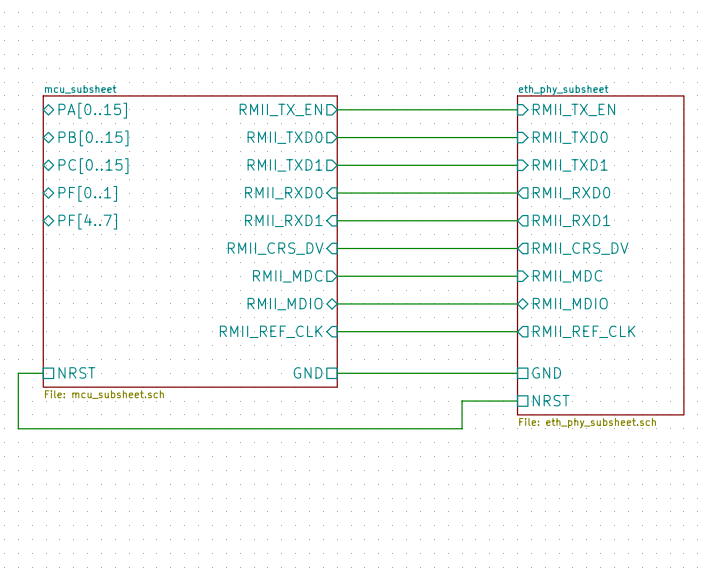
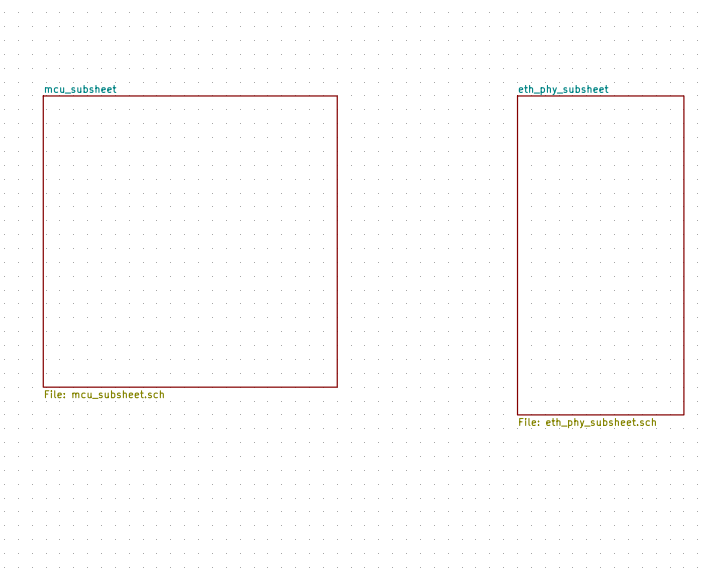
sheet pin: RMII_TX_EN (280, 109) -> none
wire: (337, 109) (517, 109) -> none
sheet pin: RMII_TX_EN (573, 109) -> none
sheet pin: PA[0..15] (92, 110) -> none
sheet pin: RMII_TXD0 (285, 137) -> none
wire: (337, 137) (517, 137) -> none
sheet pin: RMII_TXD0 (570, 137) -> none
sheet pin: PB[0..15] (93, 138) -> none
sheet pin: RMII_TXD1 (285, 165) -> none
wire: (337, 165) (517, 165) -> none
sheet pin: RMII_TXD1 (570, 165) -> none
sheet pin: PC[0..15] (93, 166) -> none
sheet pin: PF[0..1] (87, 193) -> none
sheet pin: RMII_RXD0 (283, 193) -> none
wire: (337, 193) (517, 193) -> none
sheet pin: RMII_RXD0 (571, 193) -> none
sheet pin: RMII_RXD1 (283, 220) -> none
wire: (337, 220) (517, 220) -> none
sheet pin: RMII_RXD1 (571, 220) -> none
sheet pin: PF[4..7] (87, 221) -> none
sheet pin: RMII_CRS_DV (275, 248) -> none
wire: (337, 248) (517, 248) -> none
sheet pin: RMII_CRS_DV (580, 248) -> none
sheet pin: RMII_MDC (287, 276) -> none
wire: (337, 276) (517, 276) -> none
sheet pin: RMII_MDC (567, 276) -> none
wire: (337, 303) (517, 303) -> none
sheet pin: RMII_MDIO (285, 304) -> none
sheet pin: RMII_MDIO (570, 304) -> none
sheet pin: RMII_REF_CLK (271, 331) -> none
wire: (337, 331) (517, 331) -> none
sheet pin: RMII_REF_CLK (584, 331) -> none
sheet pin: NRST (76, 372) -> none
sheet pin: GND (308, 372) -> none
sheet pin: GND (546, 372) -> none
wire: (43, 373) (18, 373) (18, 428) (462, 428) (462, 401) (517, 401) -> none
wire: (337, 373) (517, 373) -> none
sheet pin: NRST (551, 400) -> none

